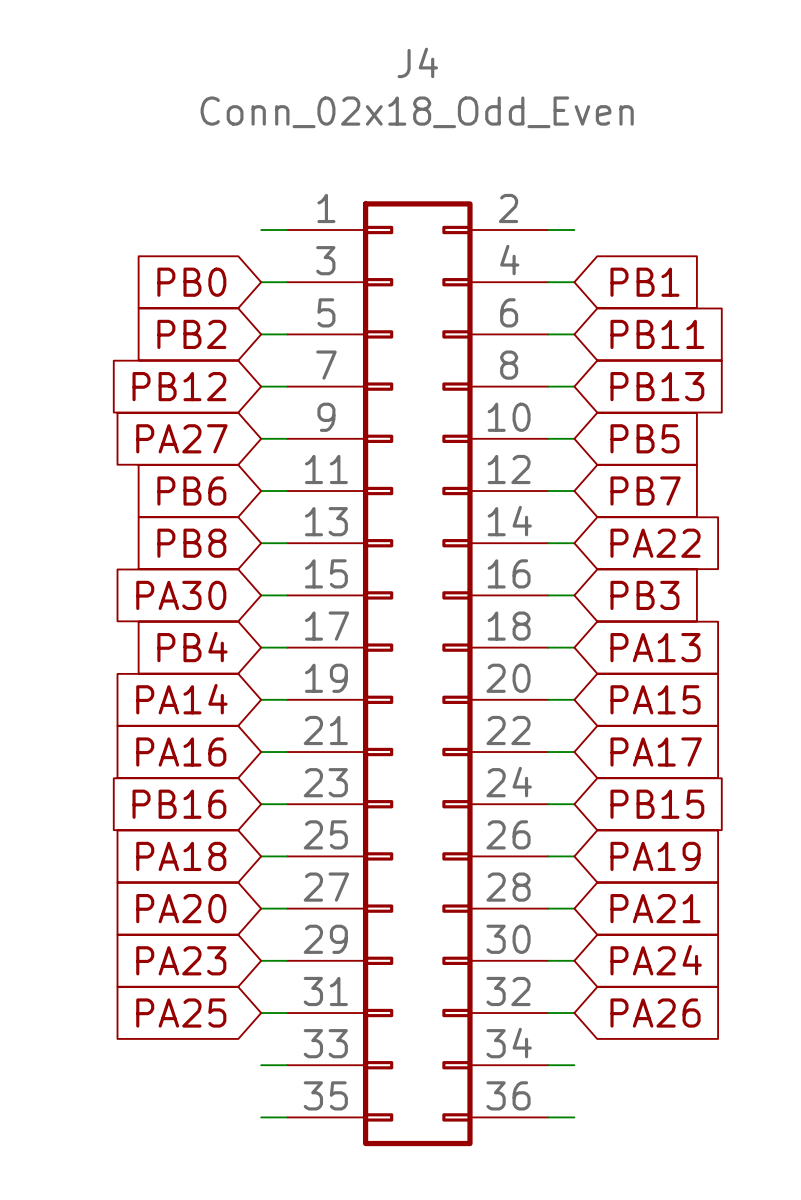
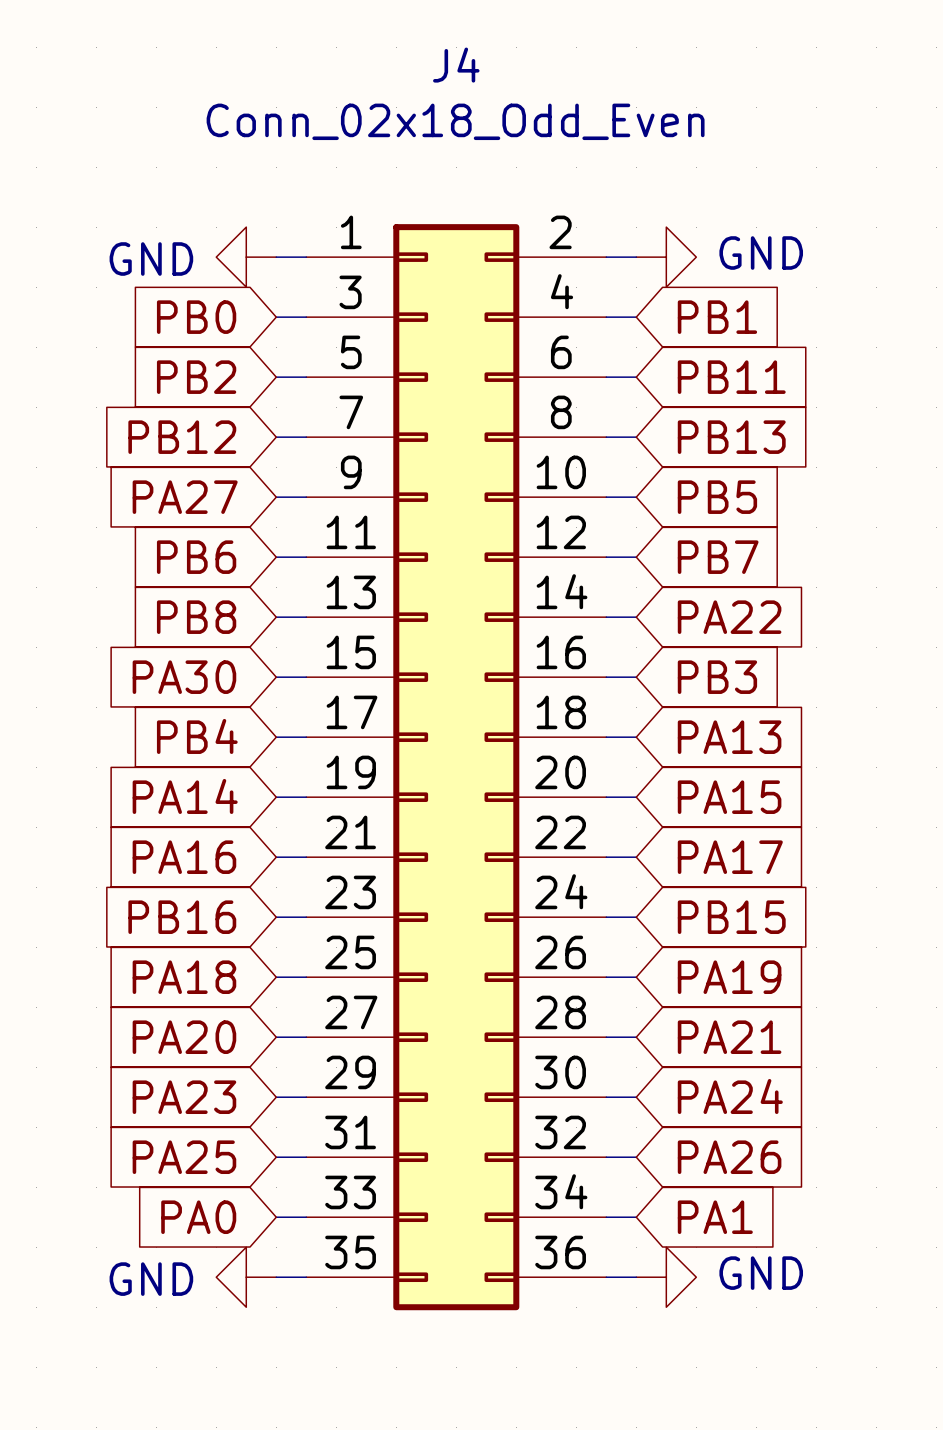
power symbol: none -> GND (246, 257)
power symbol: none -> GND (666, 257)
global label: none -> PA0 (198, 1217)
global label: none -> PA1 (715, 1217)
power symbol: none -> GND (246, 1277)
power symbol: none -> GND (666, 1277)

